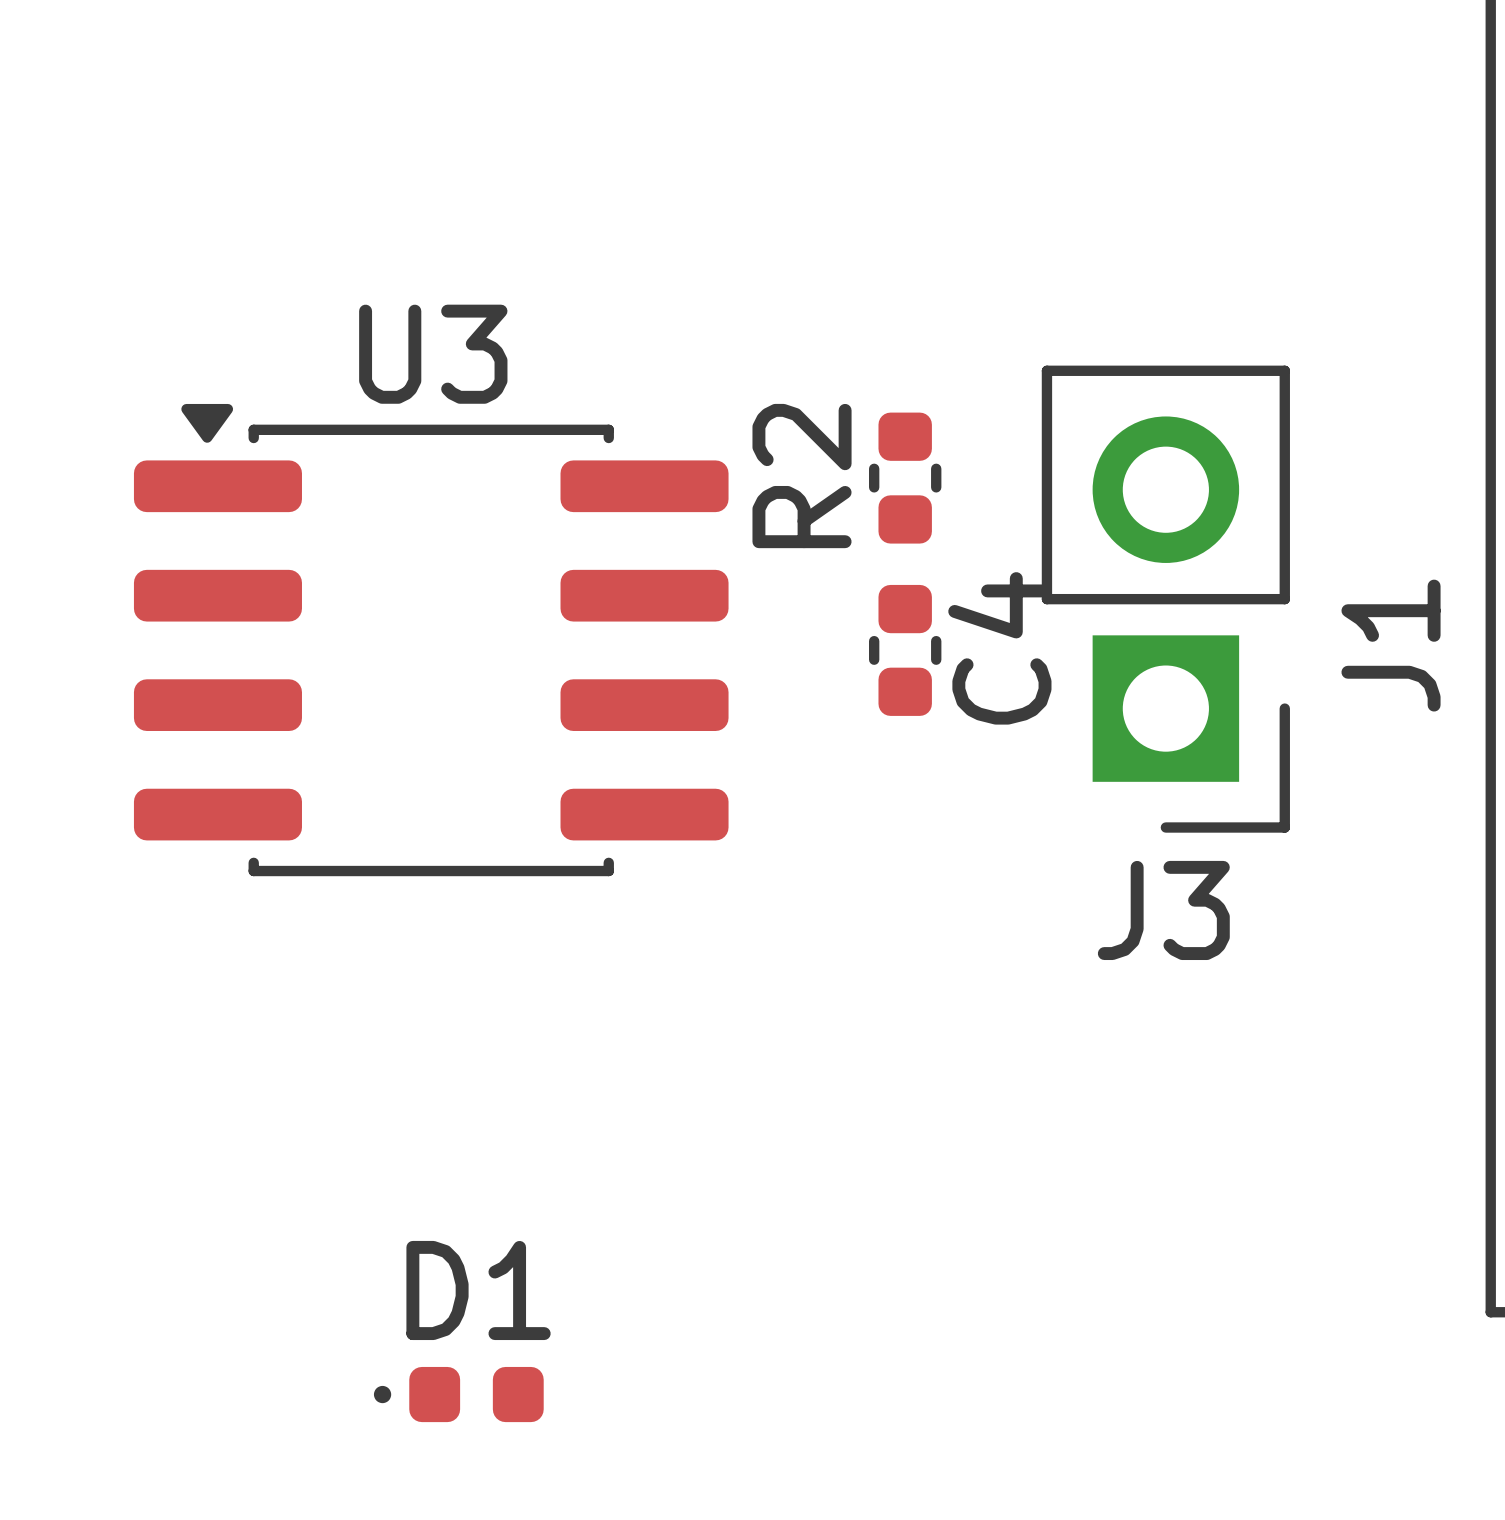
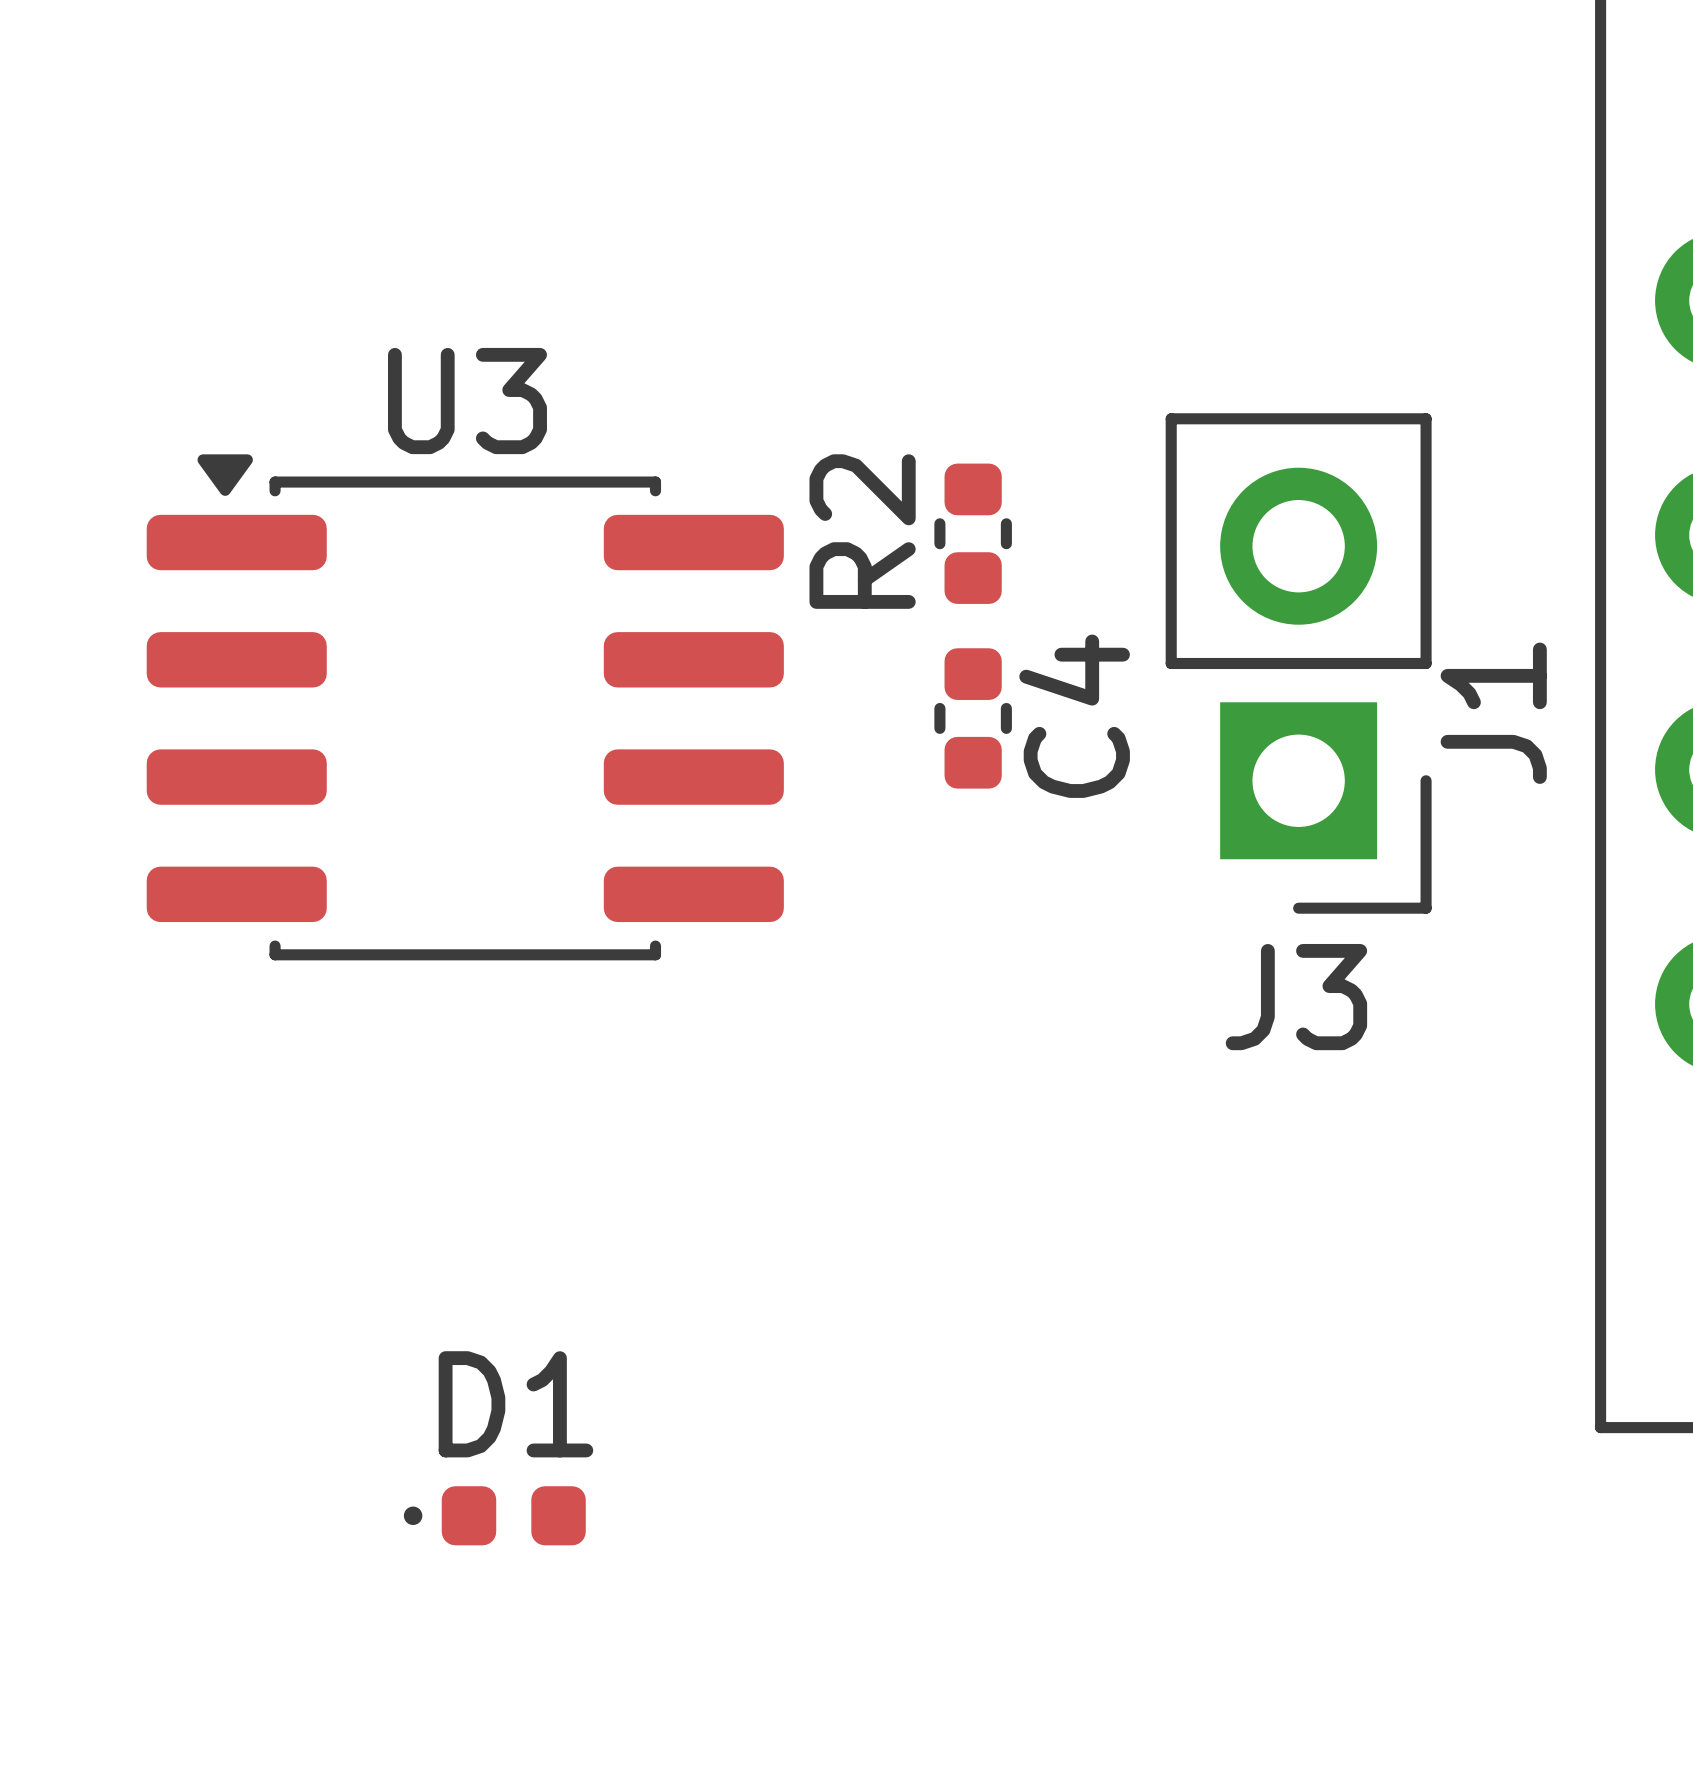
J3 position: (1165, 599) -> (1298, 663)

